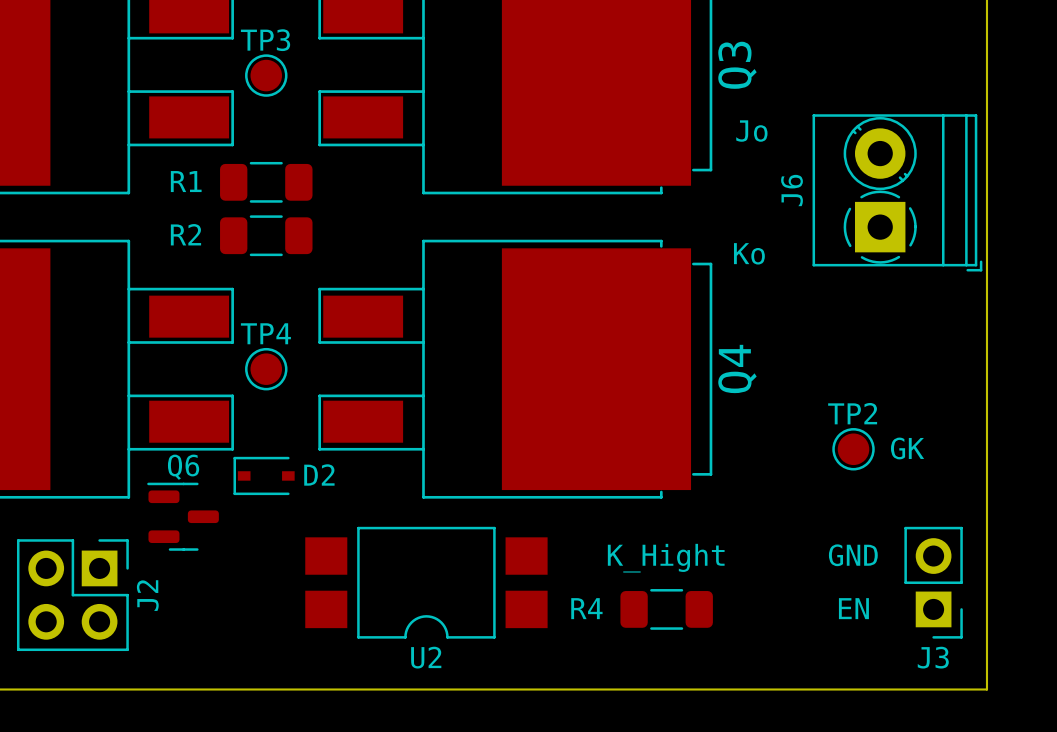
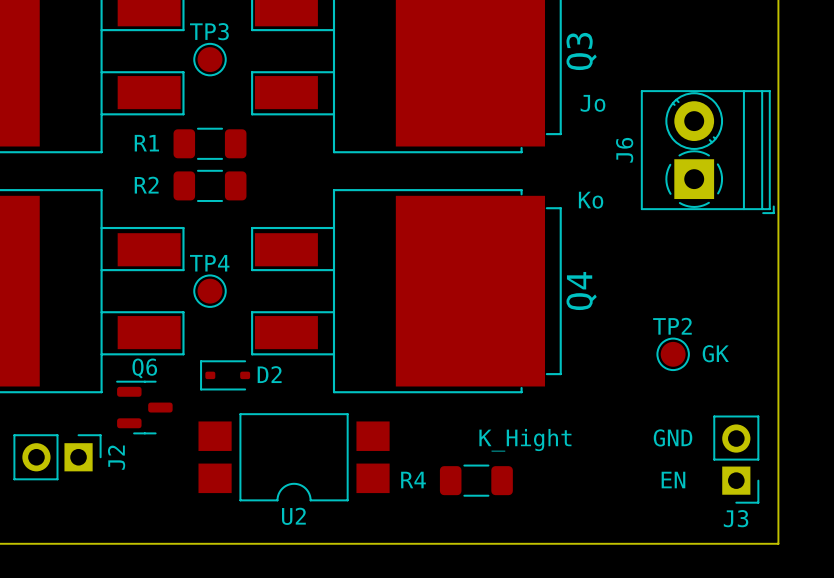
D2 footprint: [233, 456, 295, 496] -> [200, 360, 251, 391]
J2 footprint: [16, 539, 129, 652] -> [13, 434, 102, 481]
U2 position: (426, 582) -> (294, 457)
R4 position: (666, 609) -> (476, 480)

